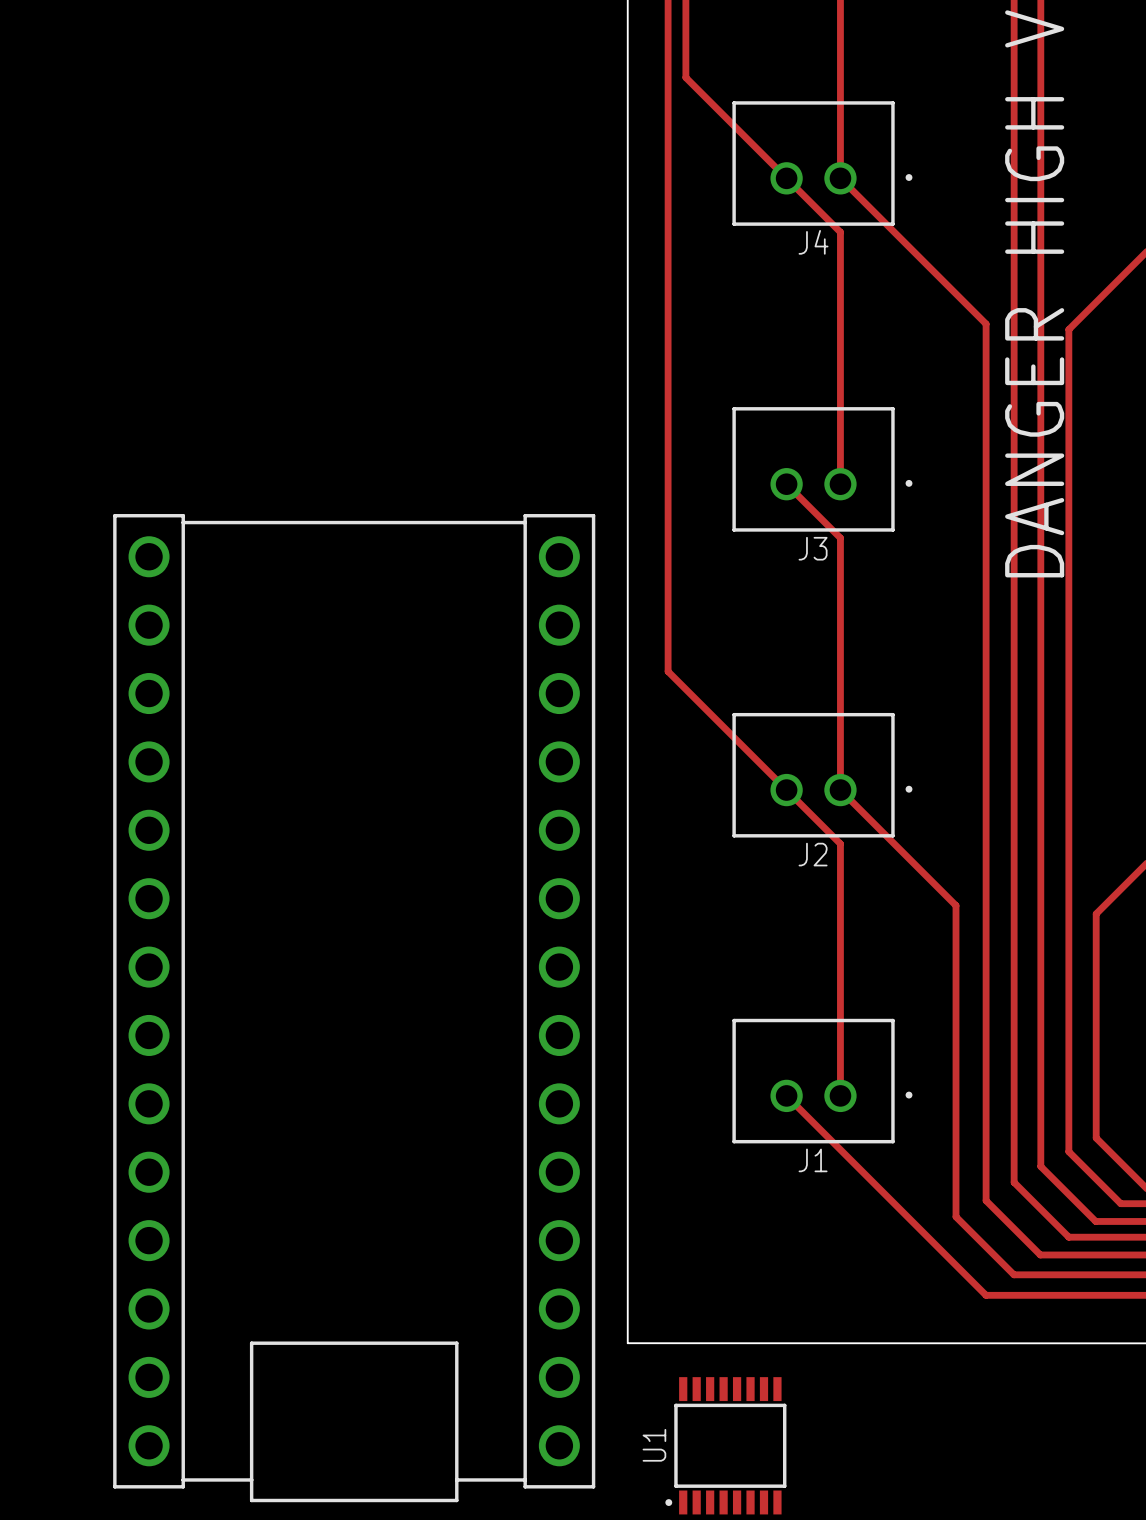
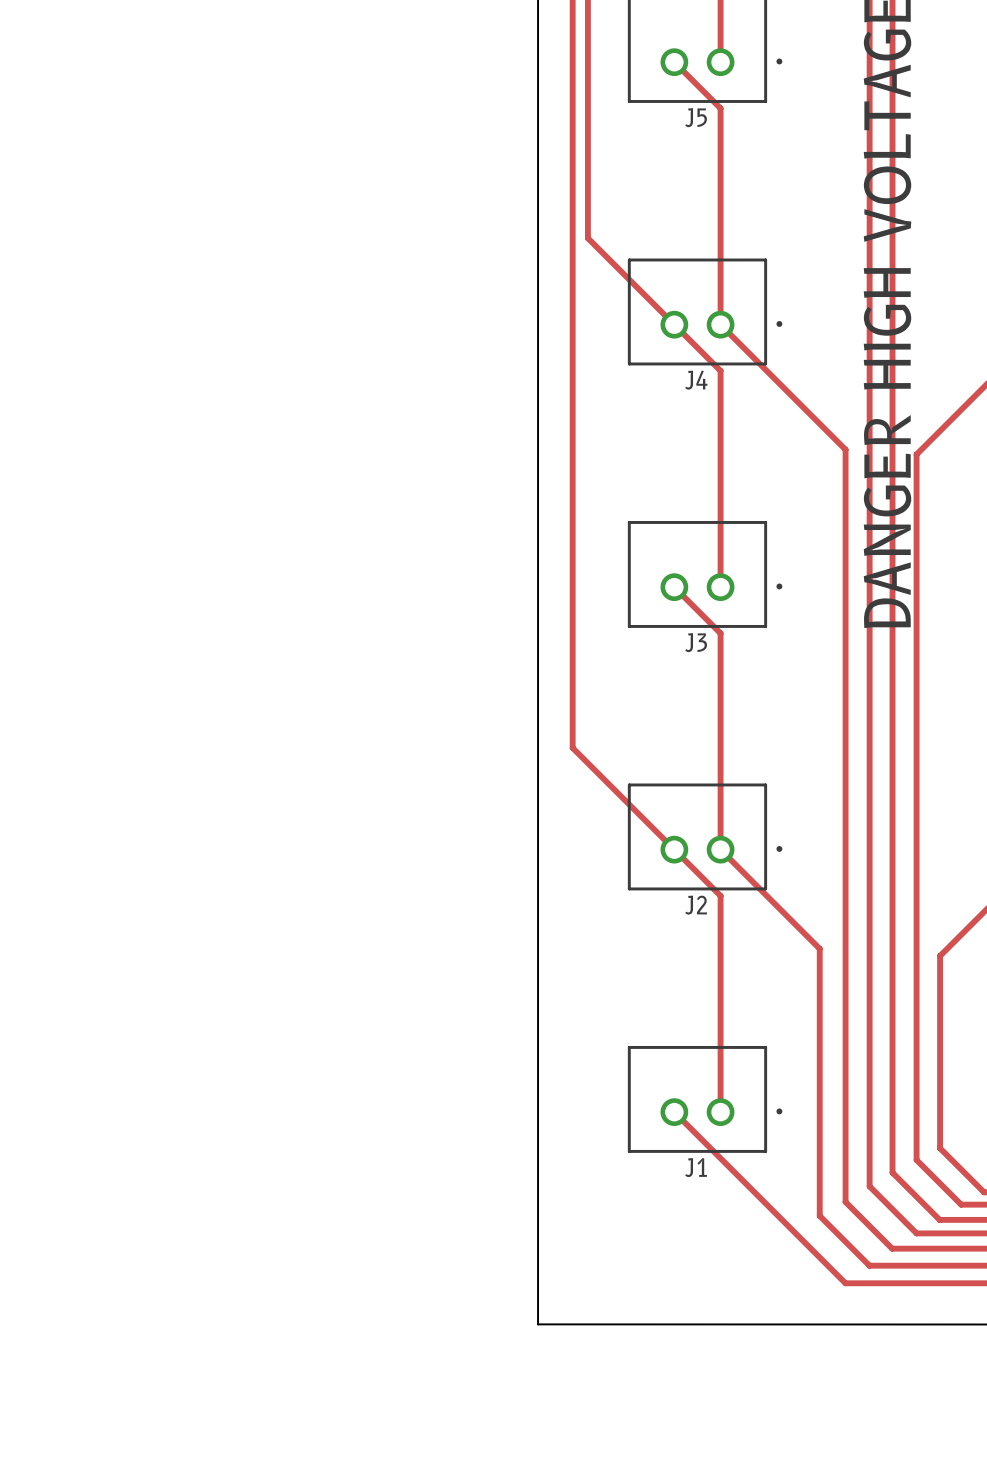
part: (354, 1008) -> none
U1: (725, 1445) -> none

